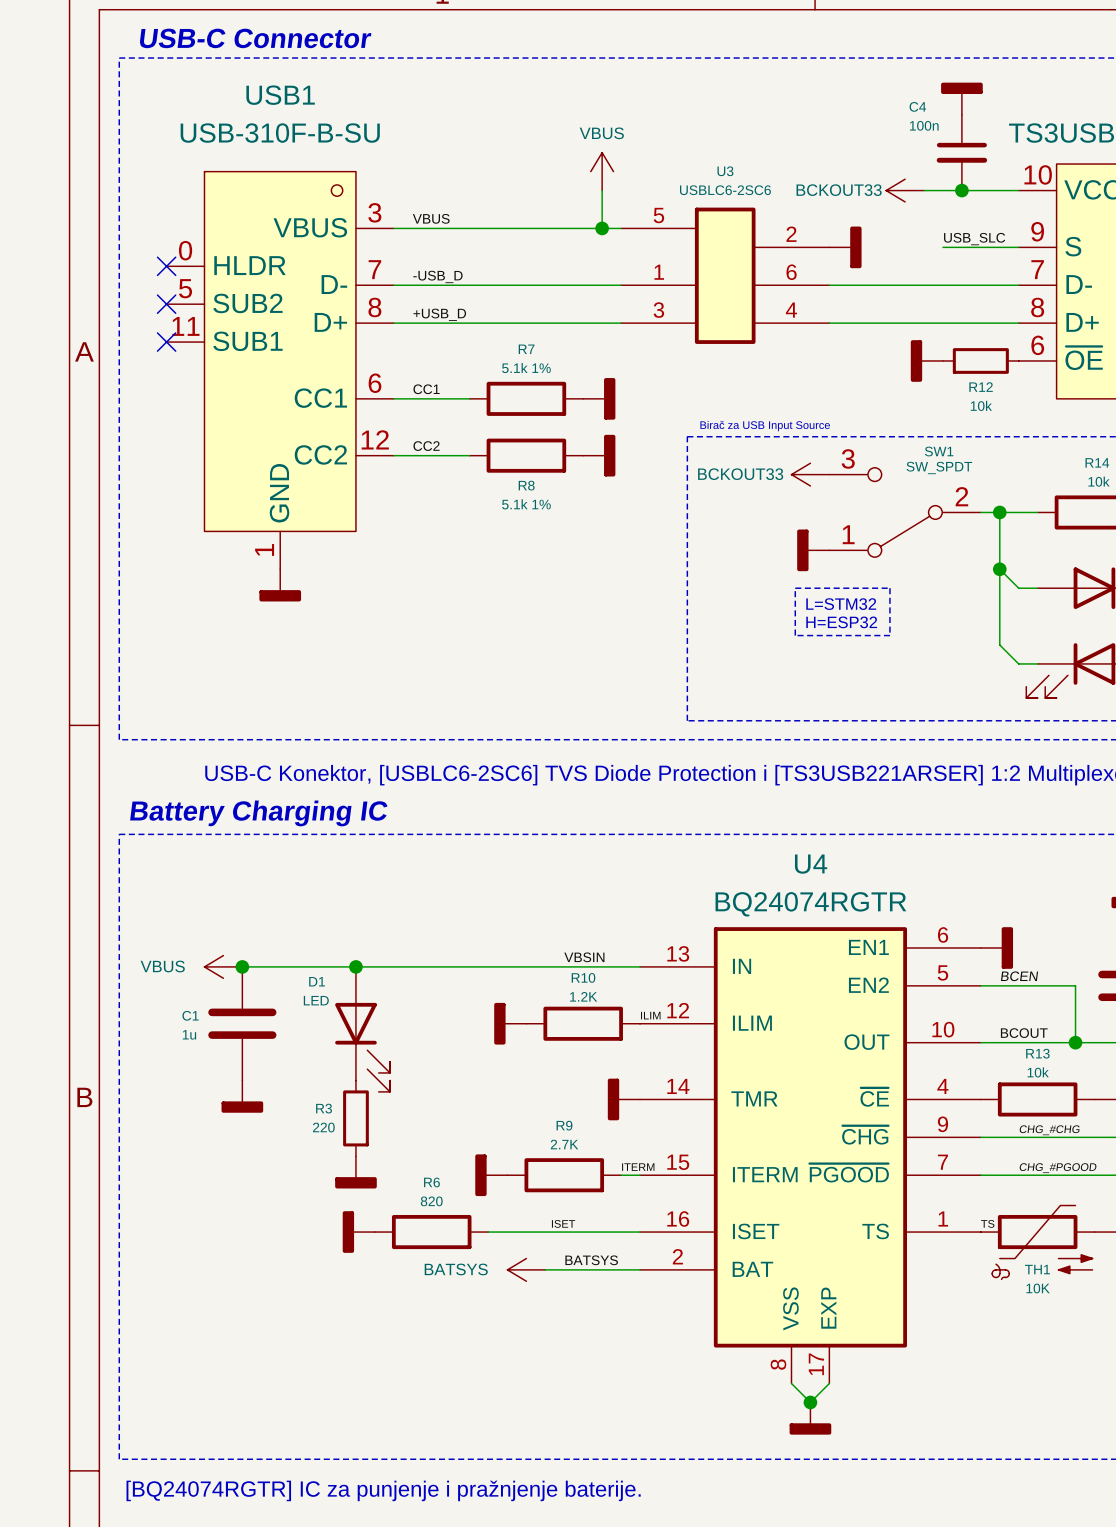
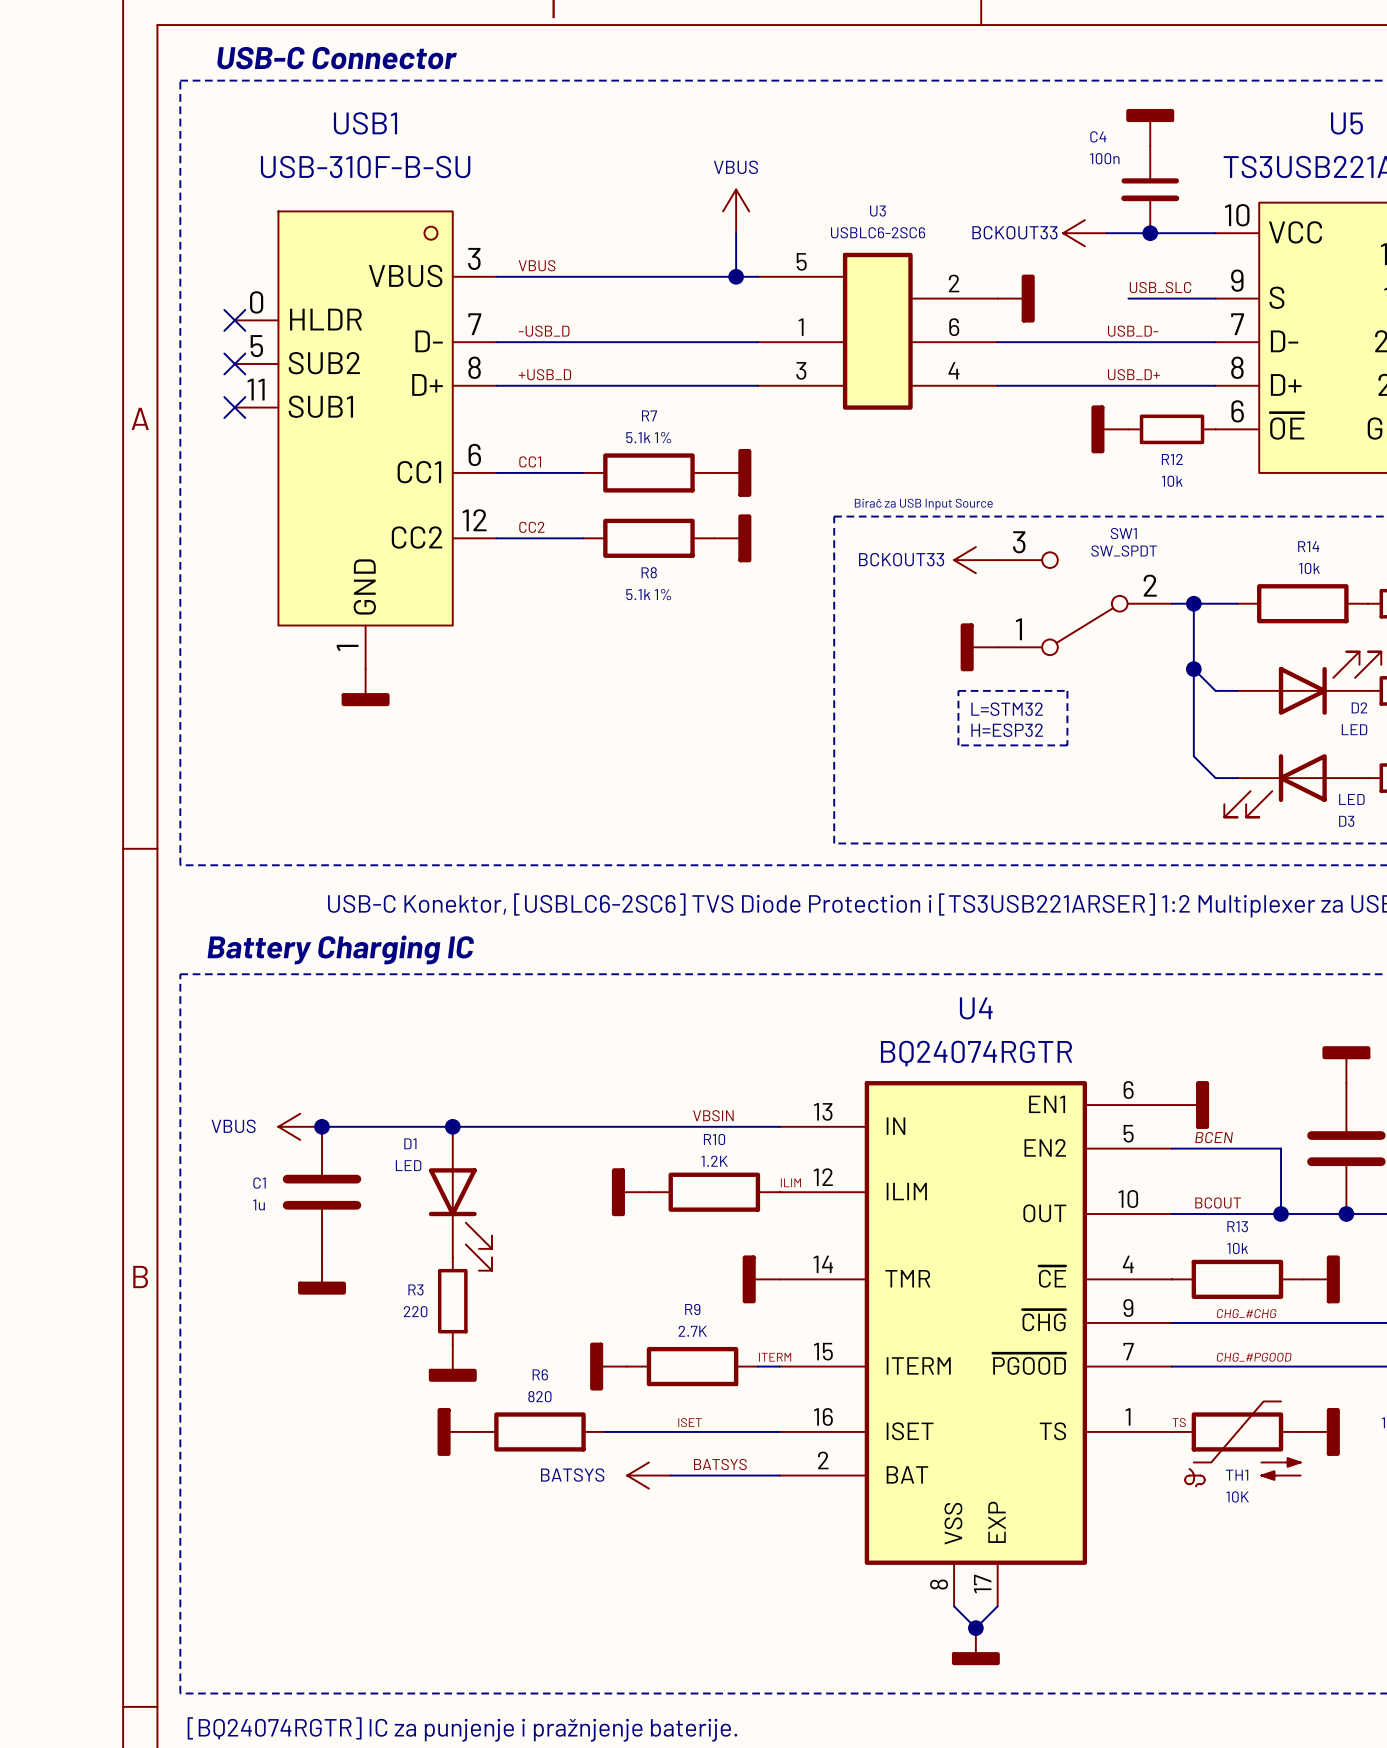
label: none -> USB_D- (1133, 331)
label: none -> USB_D+ (1133, 374)

